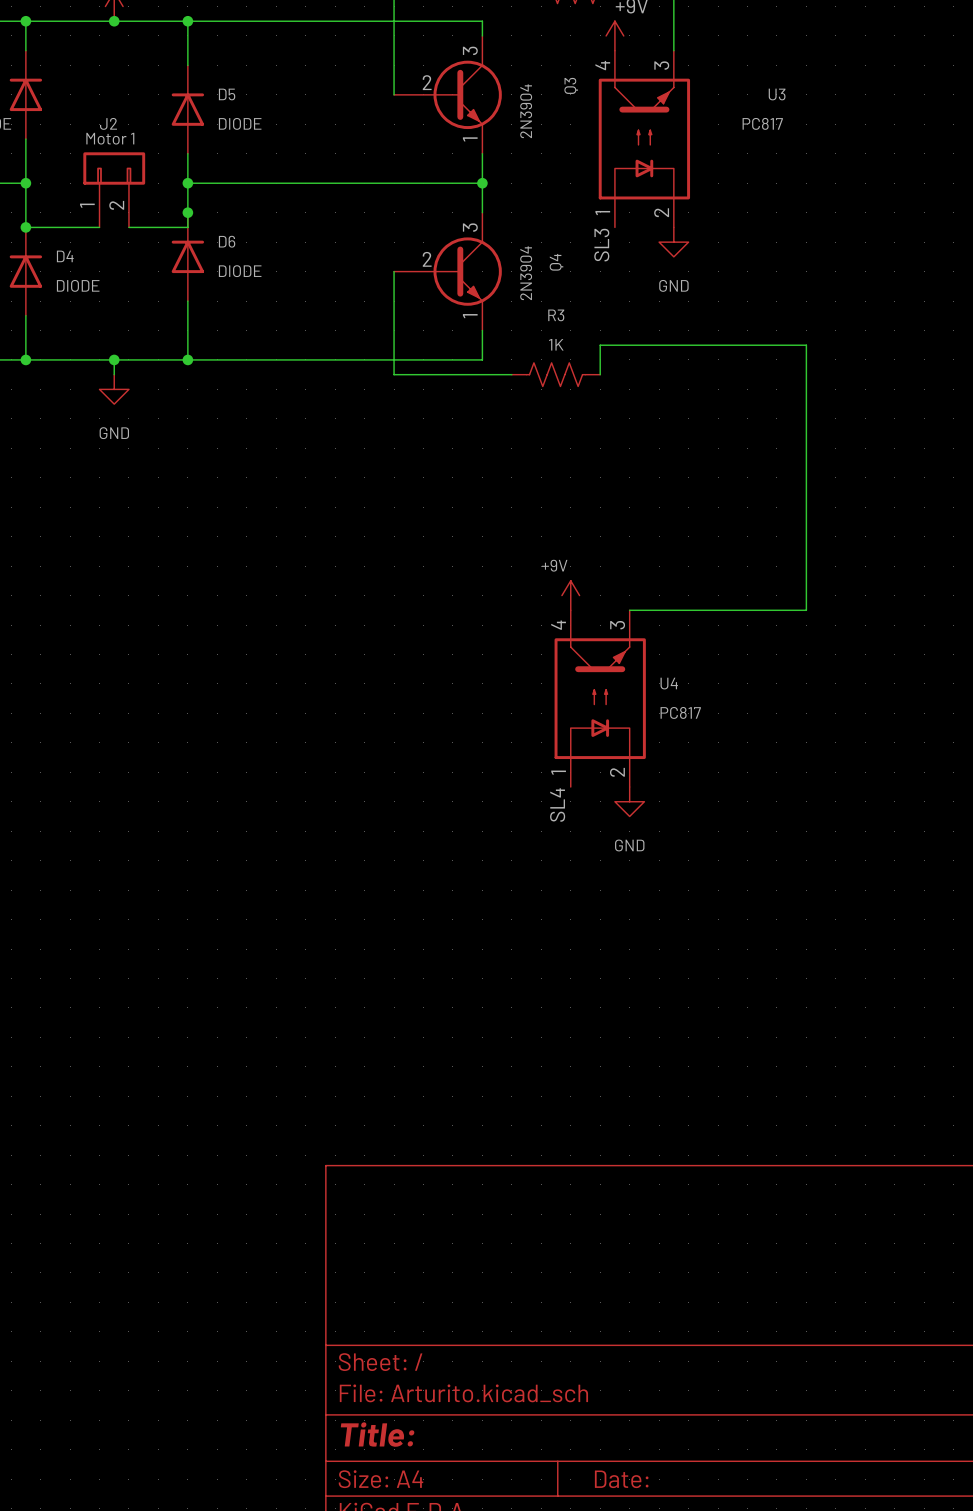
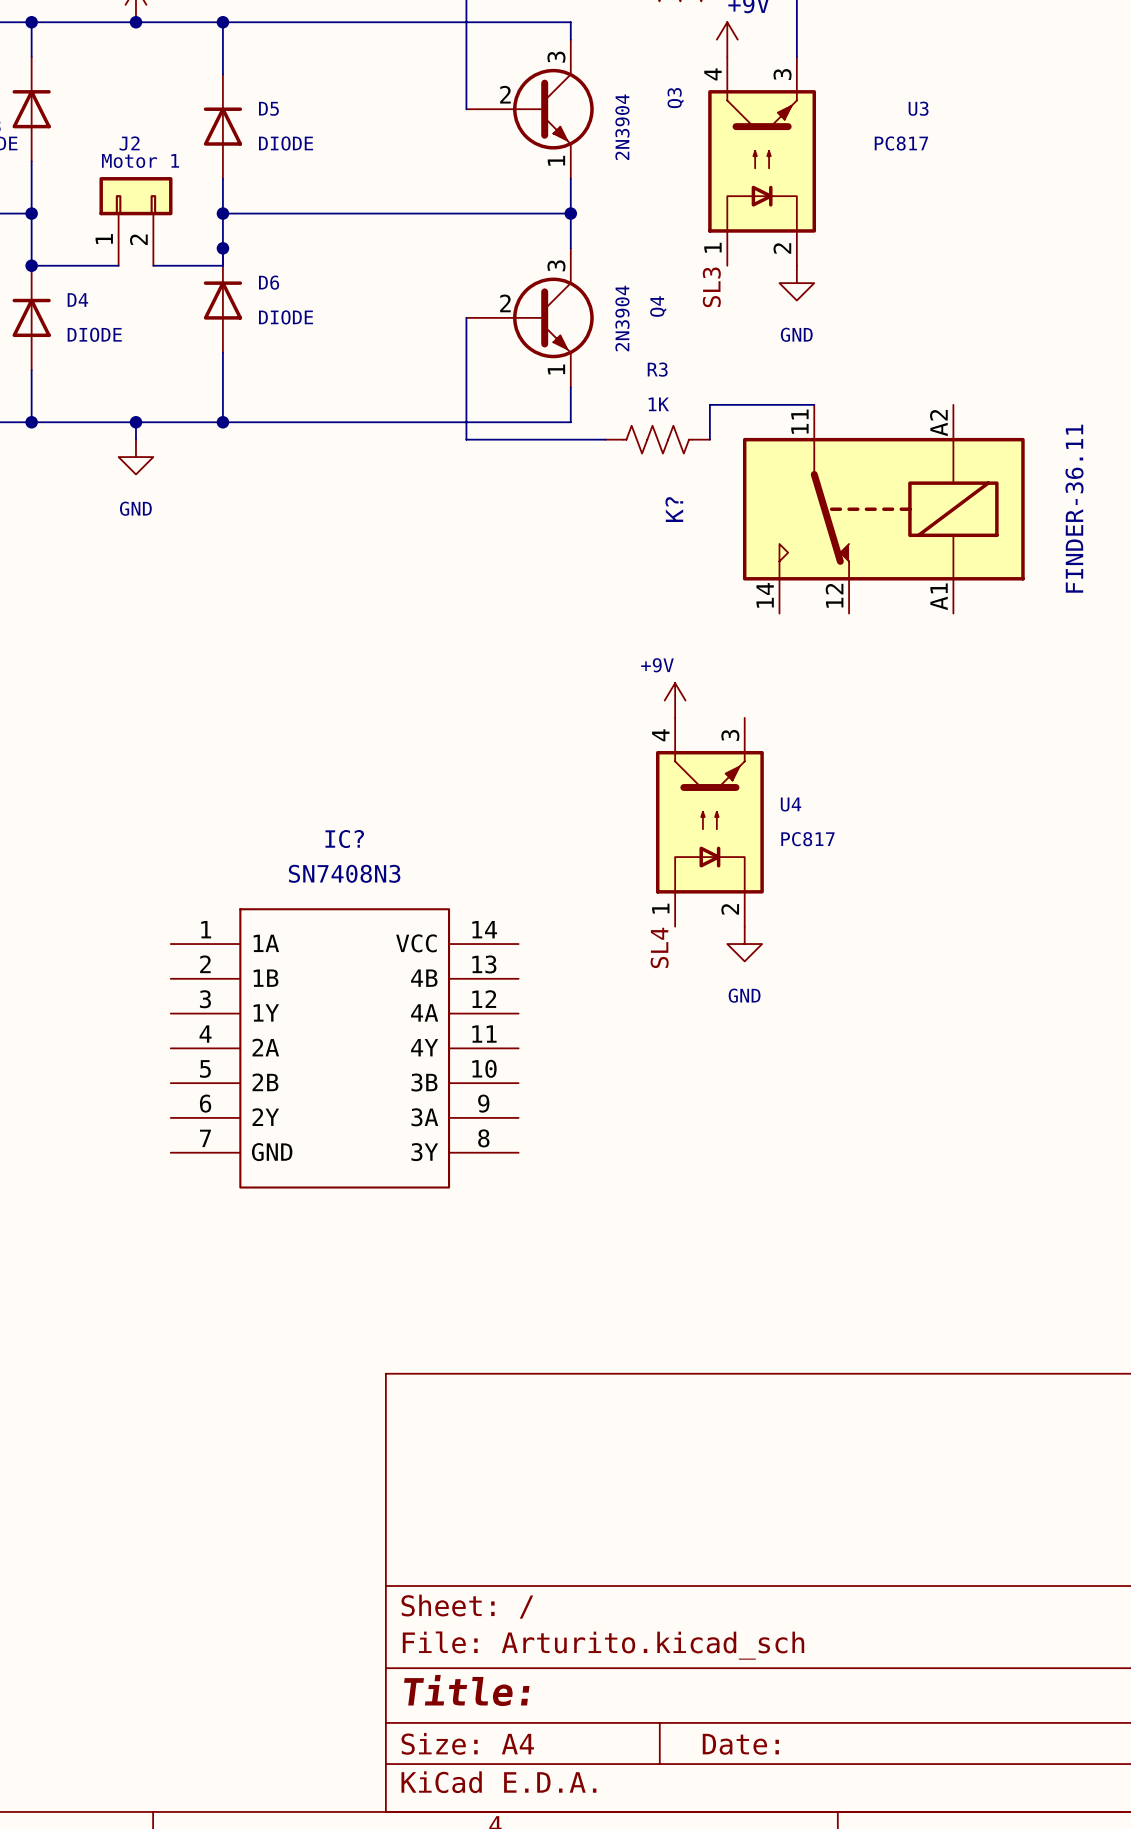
wire: (688, 345) (806, 345) (806, 610) (629, 610) -> none
K?: none -> FINDER-36.11 (883, 509)
IC?: none -> SN7408N3 (344, 1048)

